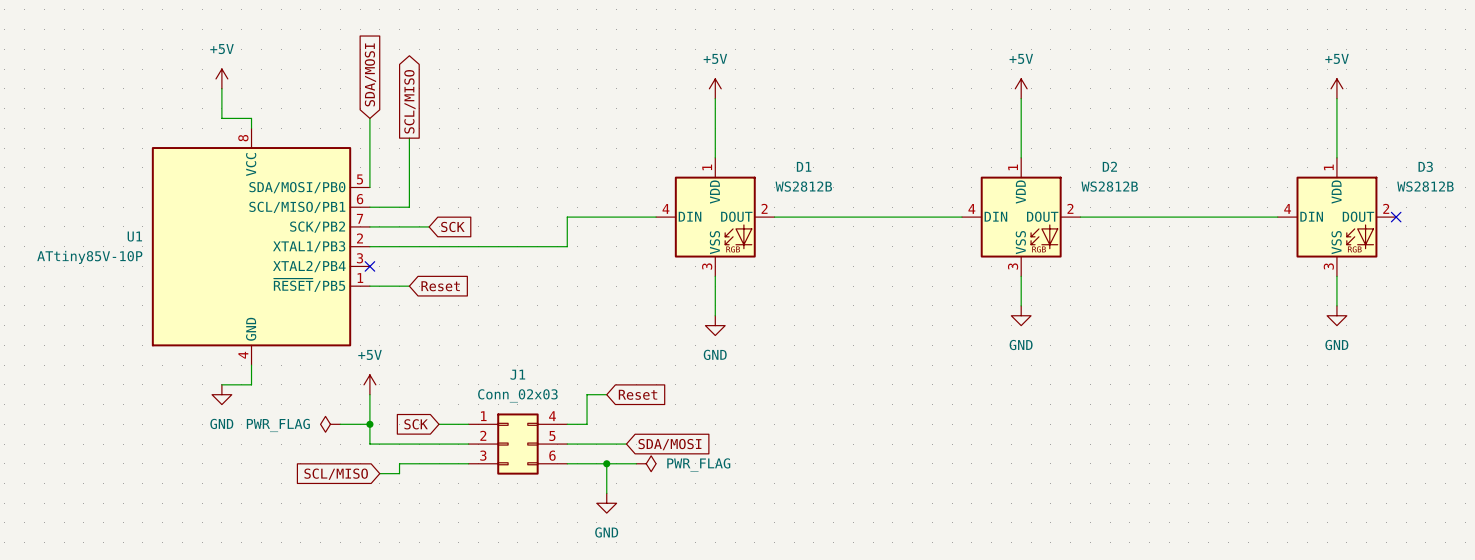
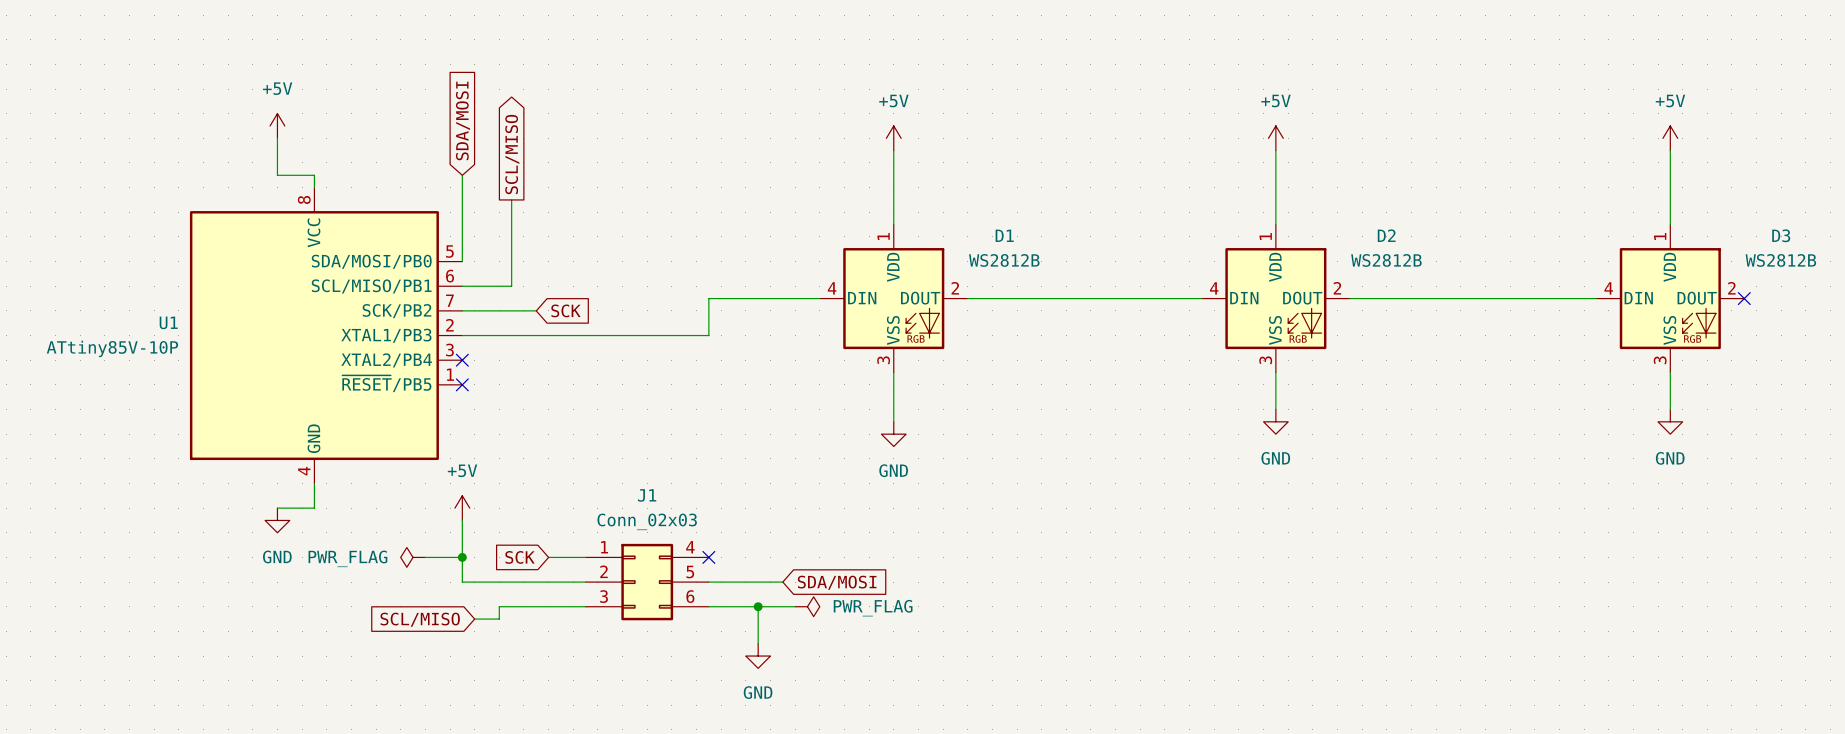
wire: (369, 286) (409, 286) -> none
no-connect mark: none -> (462, 384)
global label: Reset (440, 286) -> none
wire: (606, 394) (587, 394) (587, 424) (567, 424) -> none
global label: Reset (638, 394) -> none
no-connect mark: none -> (708, 557)

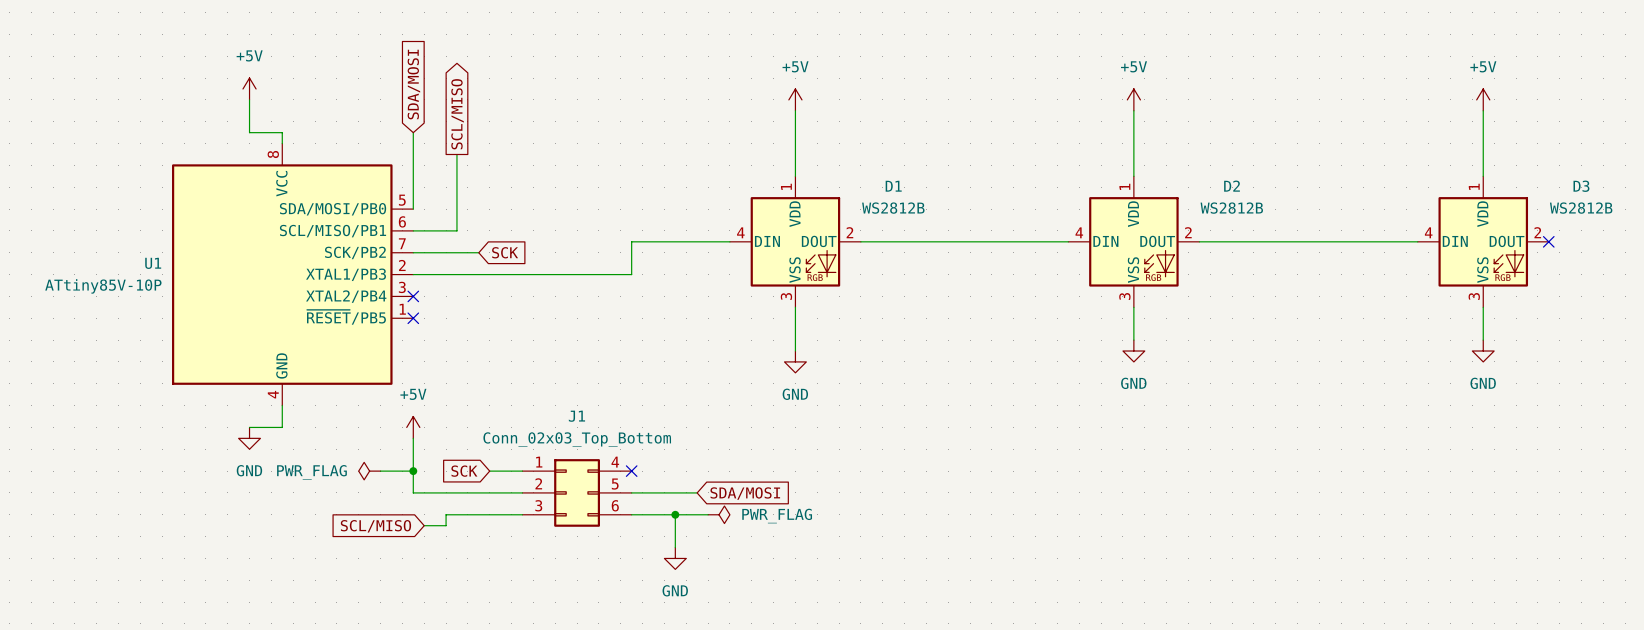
J1 value: Conn_02x03 (647, 521) -> Conn_02x03_Top_Bottom (577, 439)

